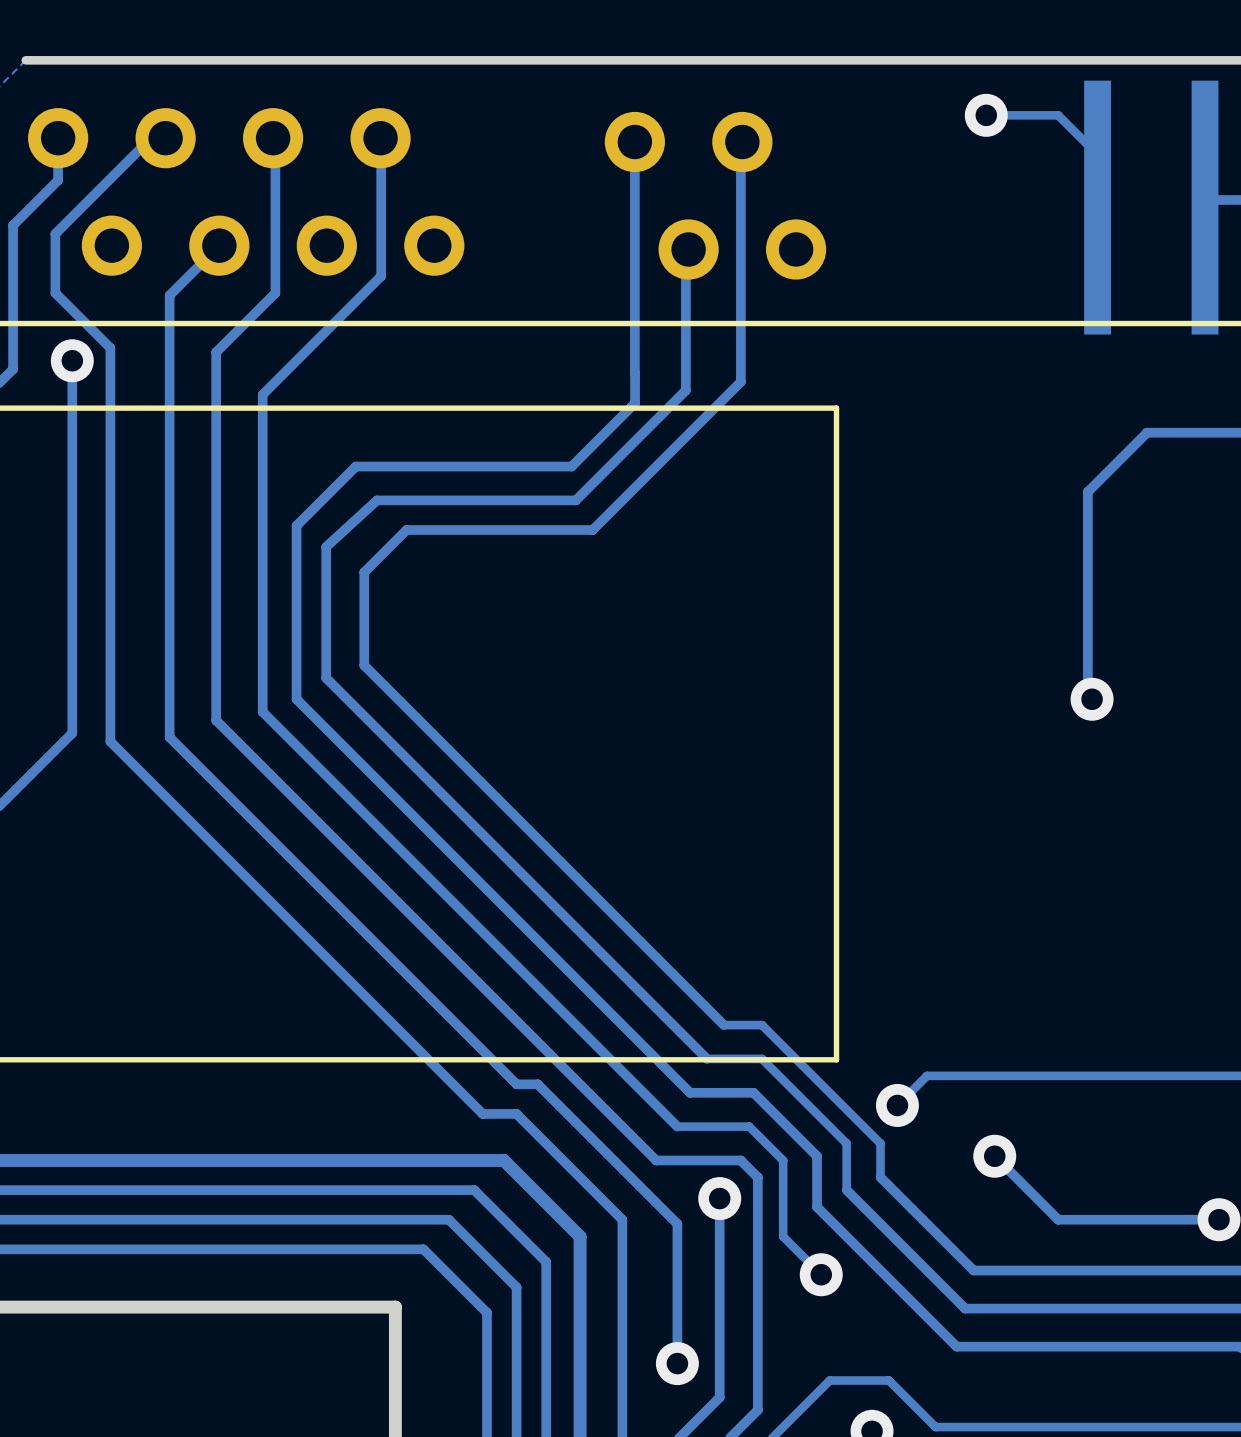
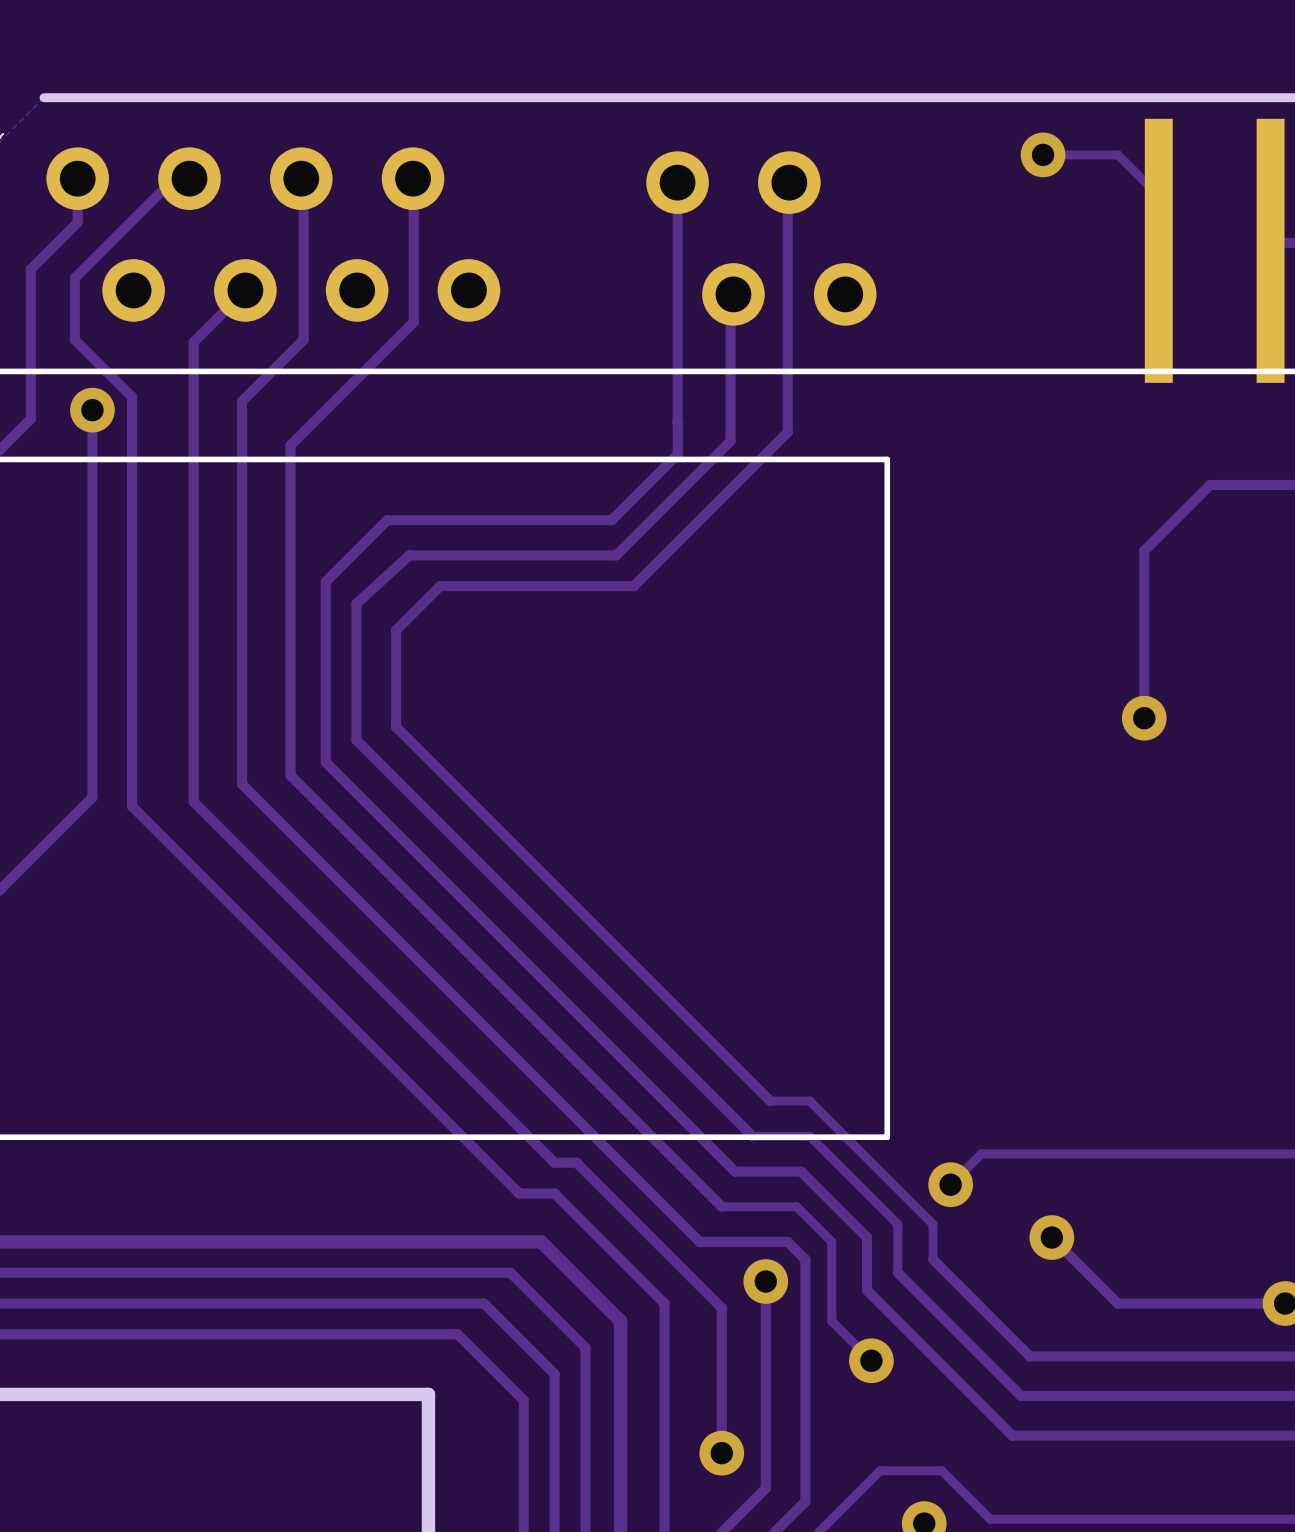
track: (1087, 491) (1087, 695) (1092, 699) -> (1148, 546) (1144, 550) (1144, 718)
via position: (1092, 699) -> (1144, 718)

